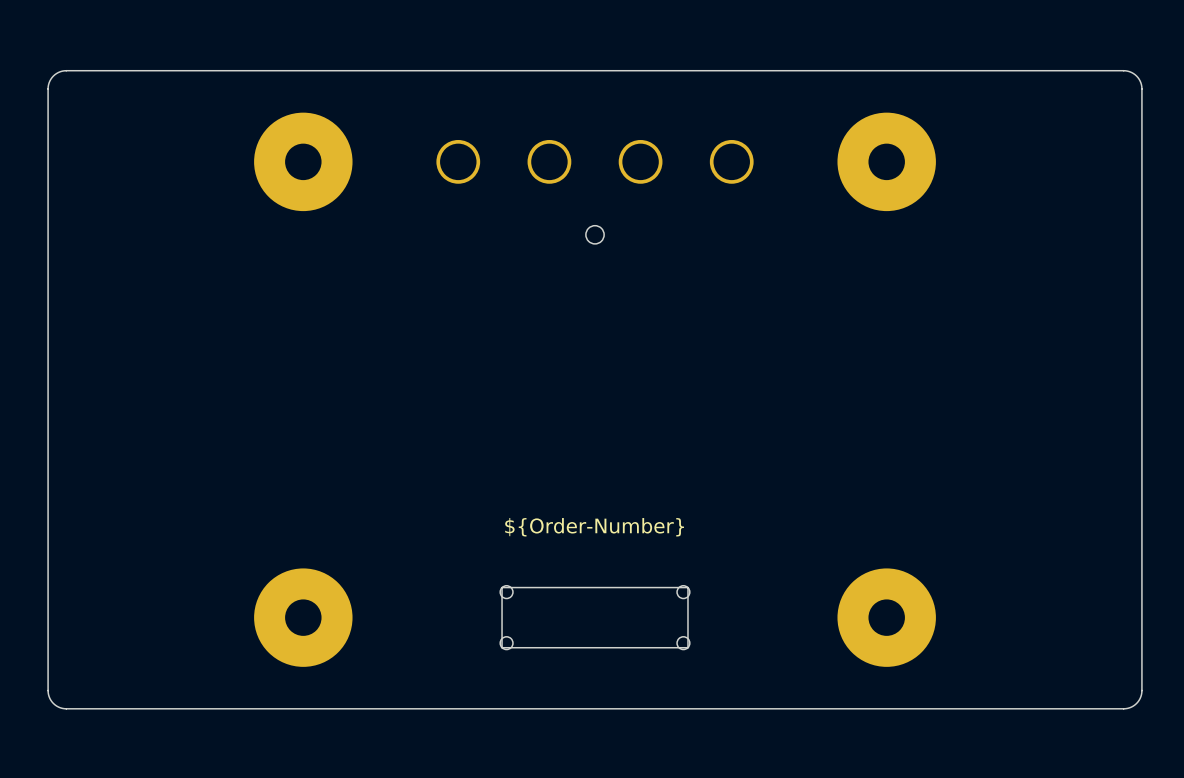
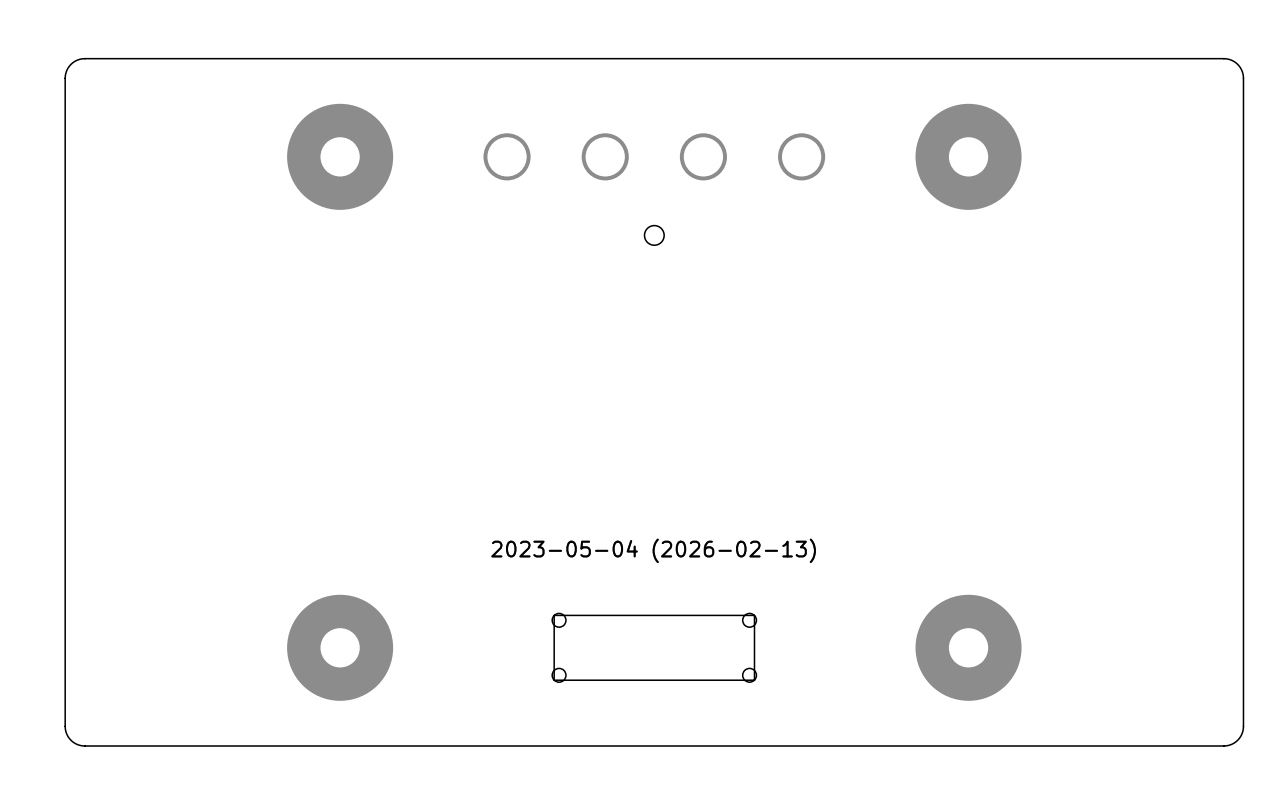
drawing shape: [505, 518, 684, 537] -> [491, 538, 816, 564]

